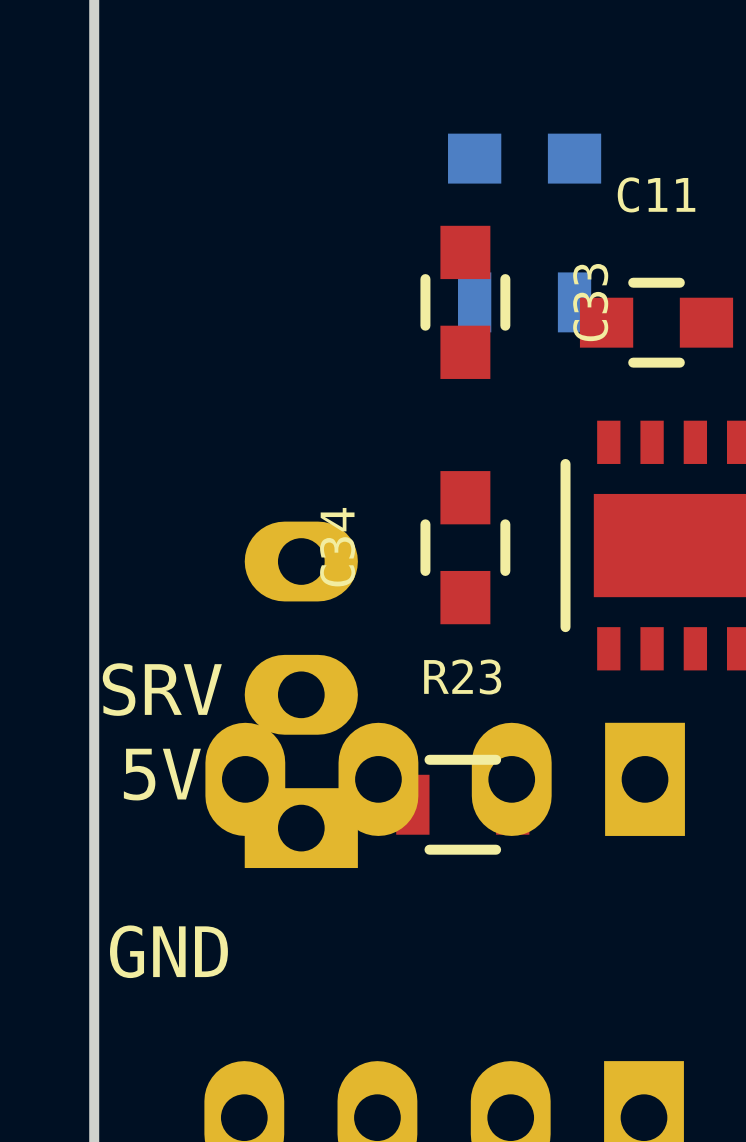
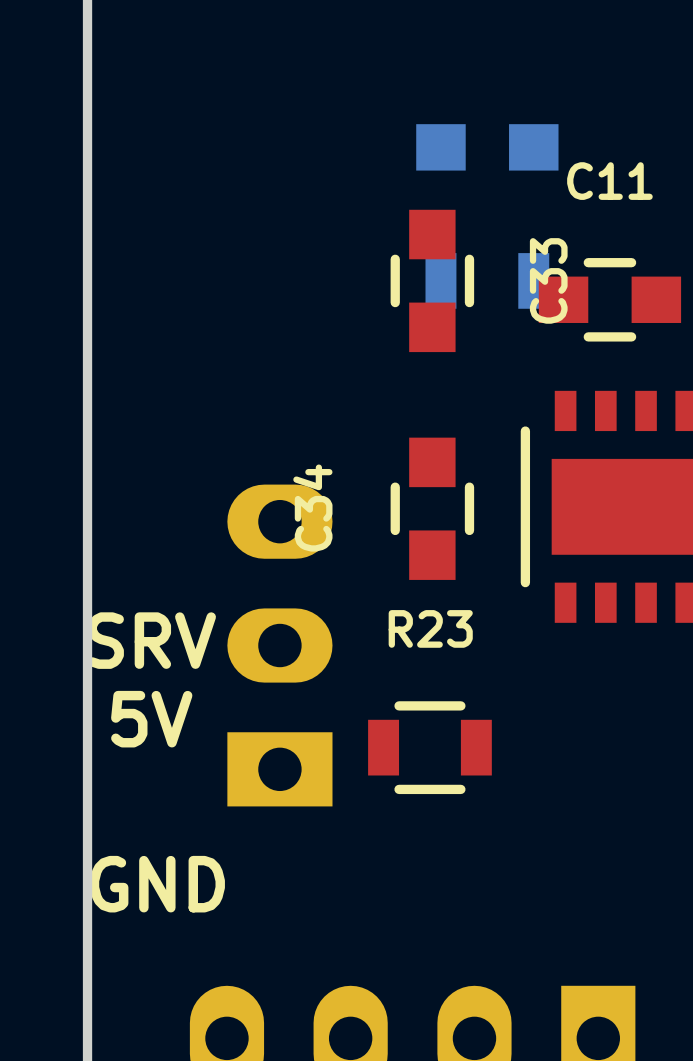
part: (445, 779) -> none

